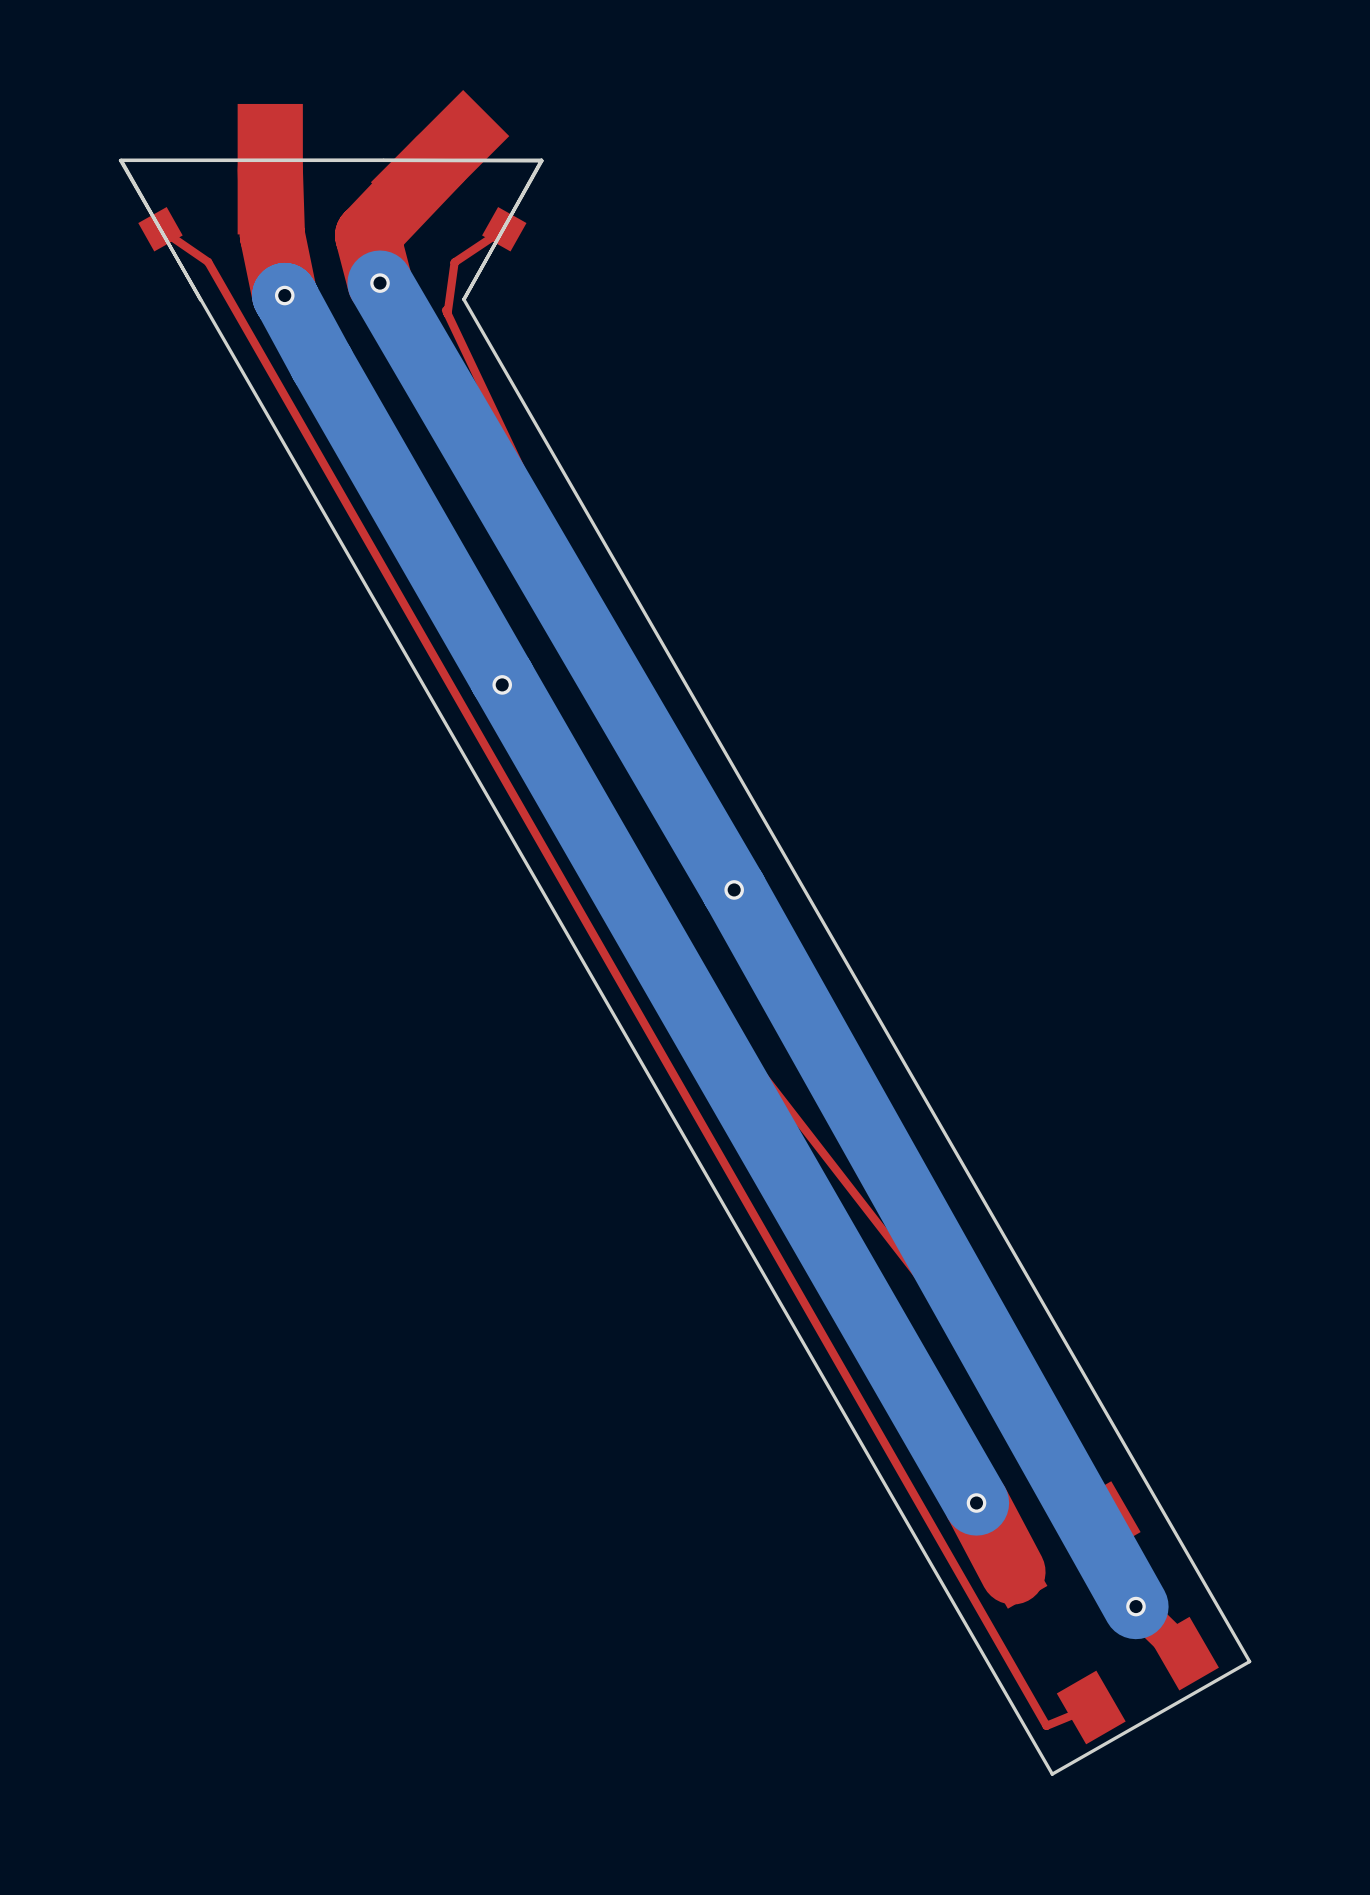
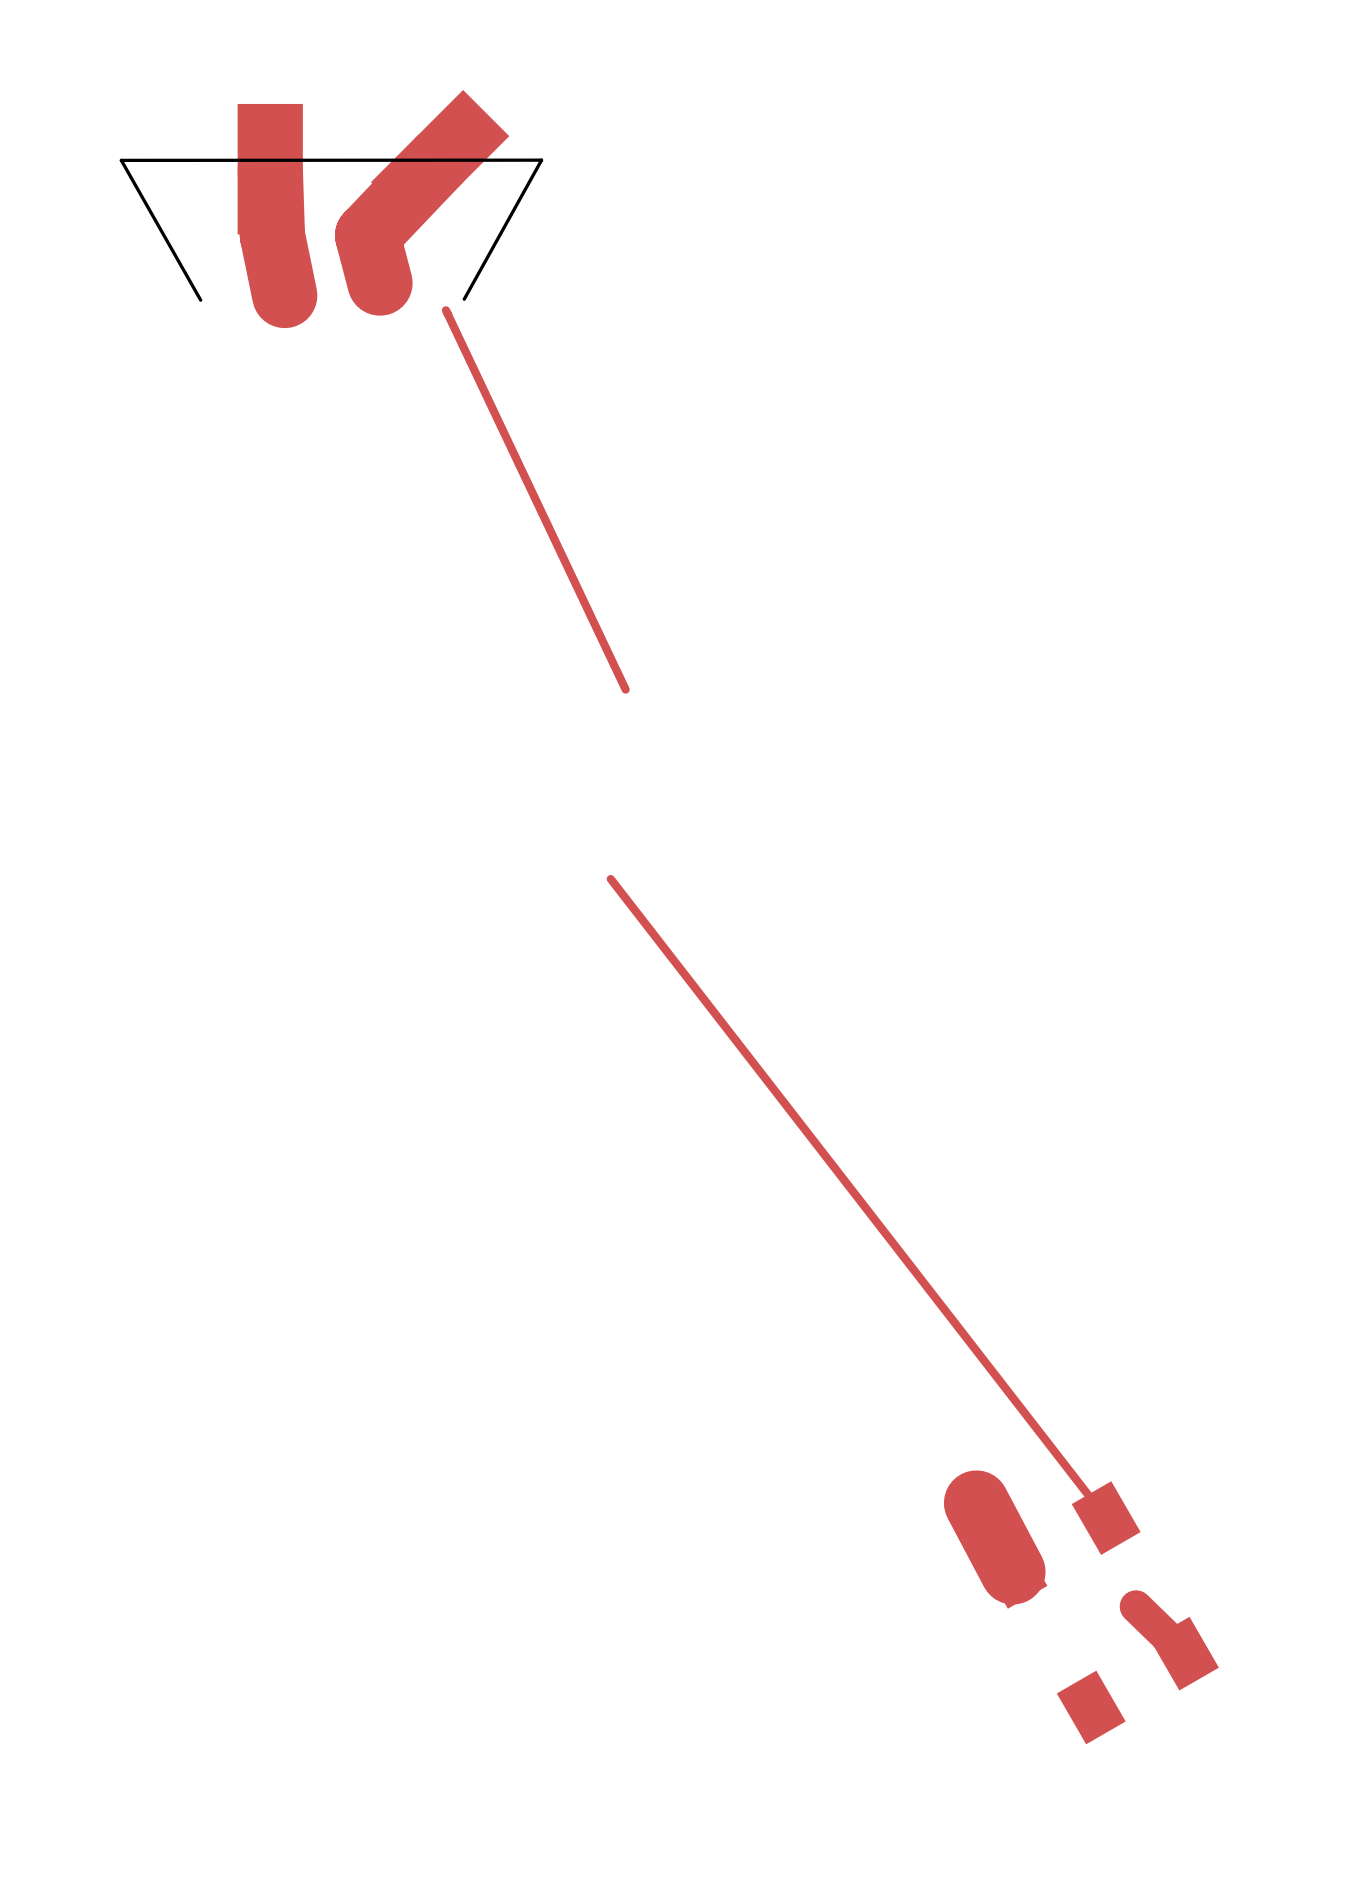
board edge: (383, 160) (541, 160) (463, 299) (1249, 1661) (1052, 1774) (120, 160) (383, 160) -> none
top track: (160, 229) (208, 261) (1046, 1725) (1091, 1707) -> none
part: (160, 229) -> none
top track: (504, 229) (454, 262) (447, 313) -> none
part: (504, 229) -> none
bottom track: (380, 283) (734, 889) (1135, 1606) -> none
via: (380, 283) -> none
bottom track: (284, 295) (502, 678) -> none
via: (284, 295) -> none
bottom track: (502, 678) (976, 1503) -> none
via: (502, 684) -> none
via: (734, 889) -> none
via: (976, 1503) -> none
via: (1135, 1606) -> none

